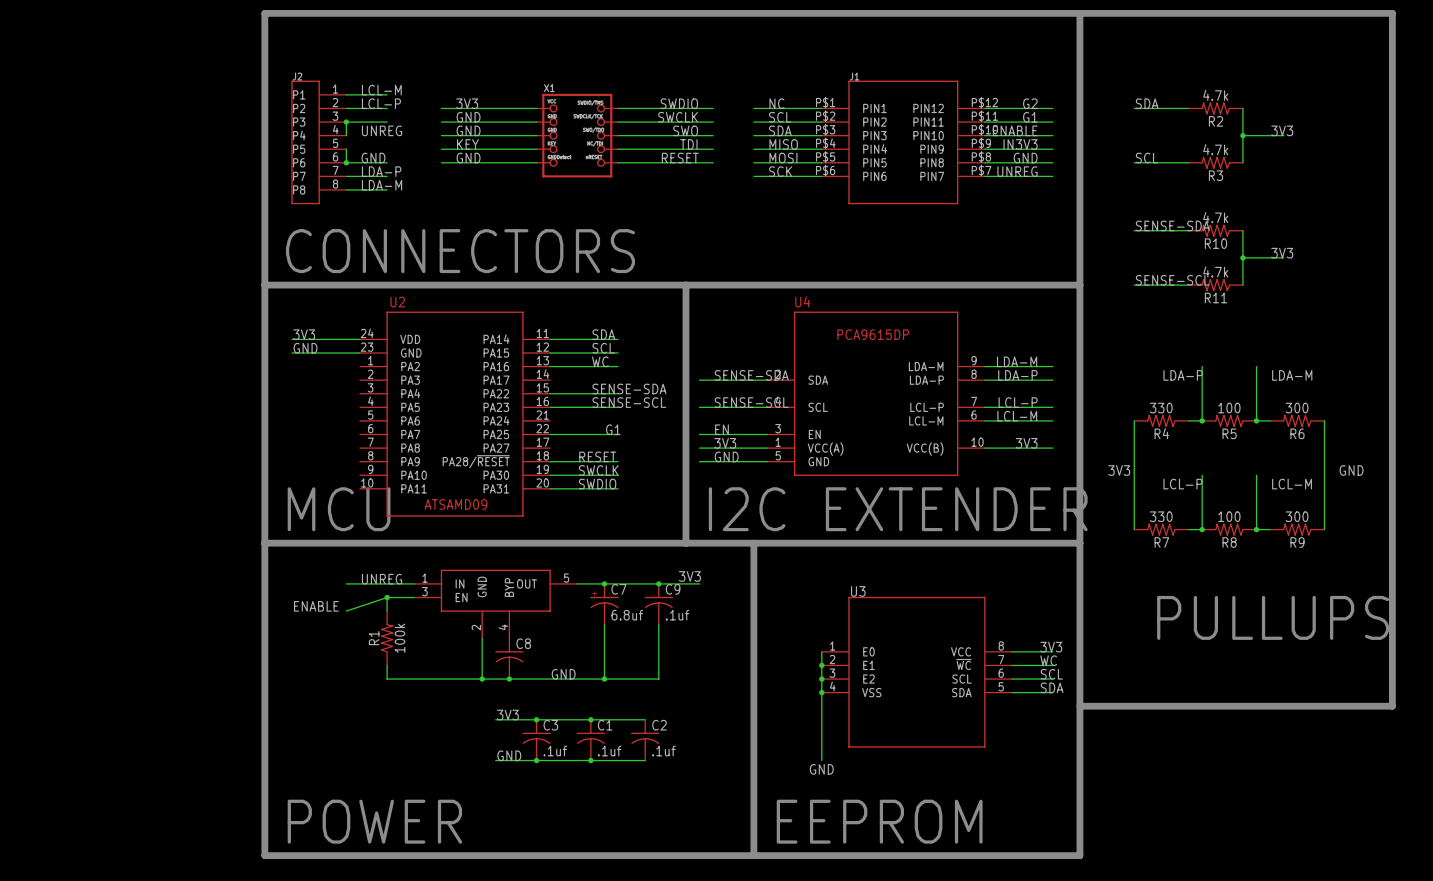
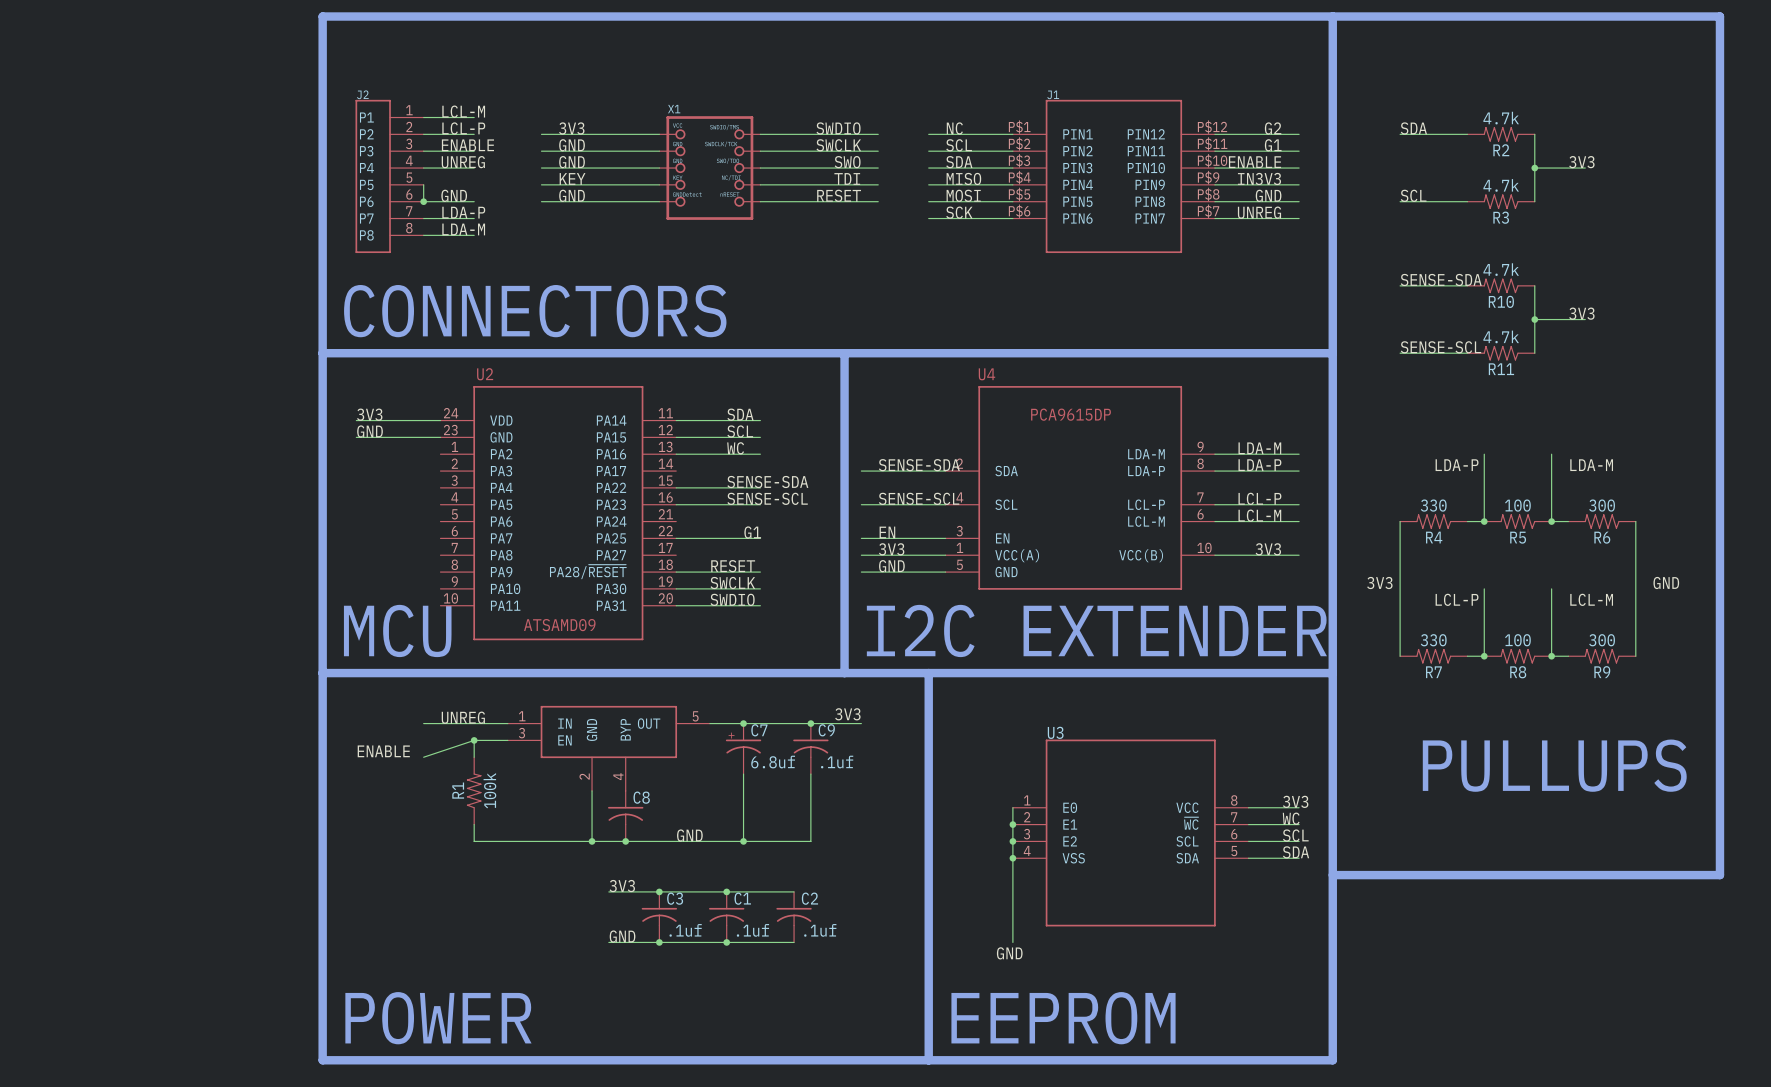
label: none -> ENABLE (467, 145)
wire: (346, 122) (346, 135) -> (474, 168) (423, 168)
junction: (346, 122) -> none

